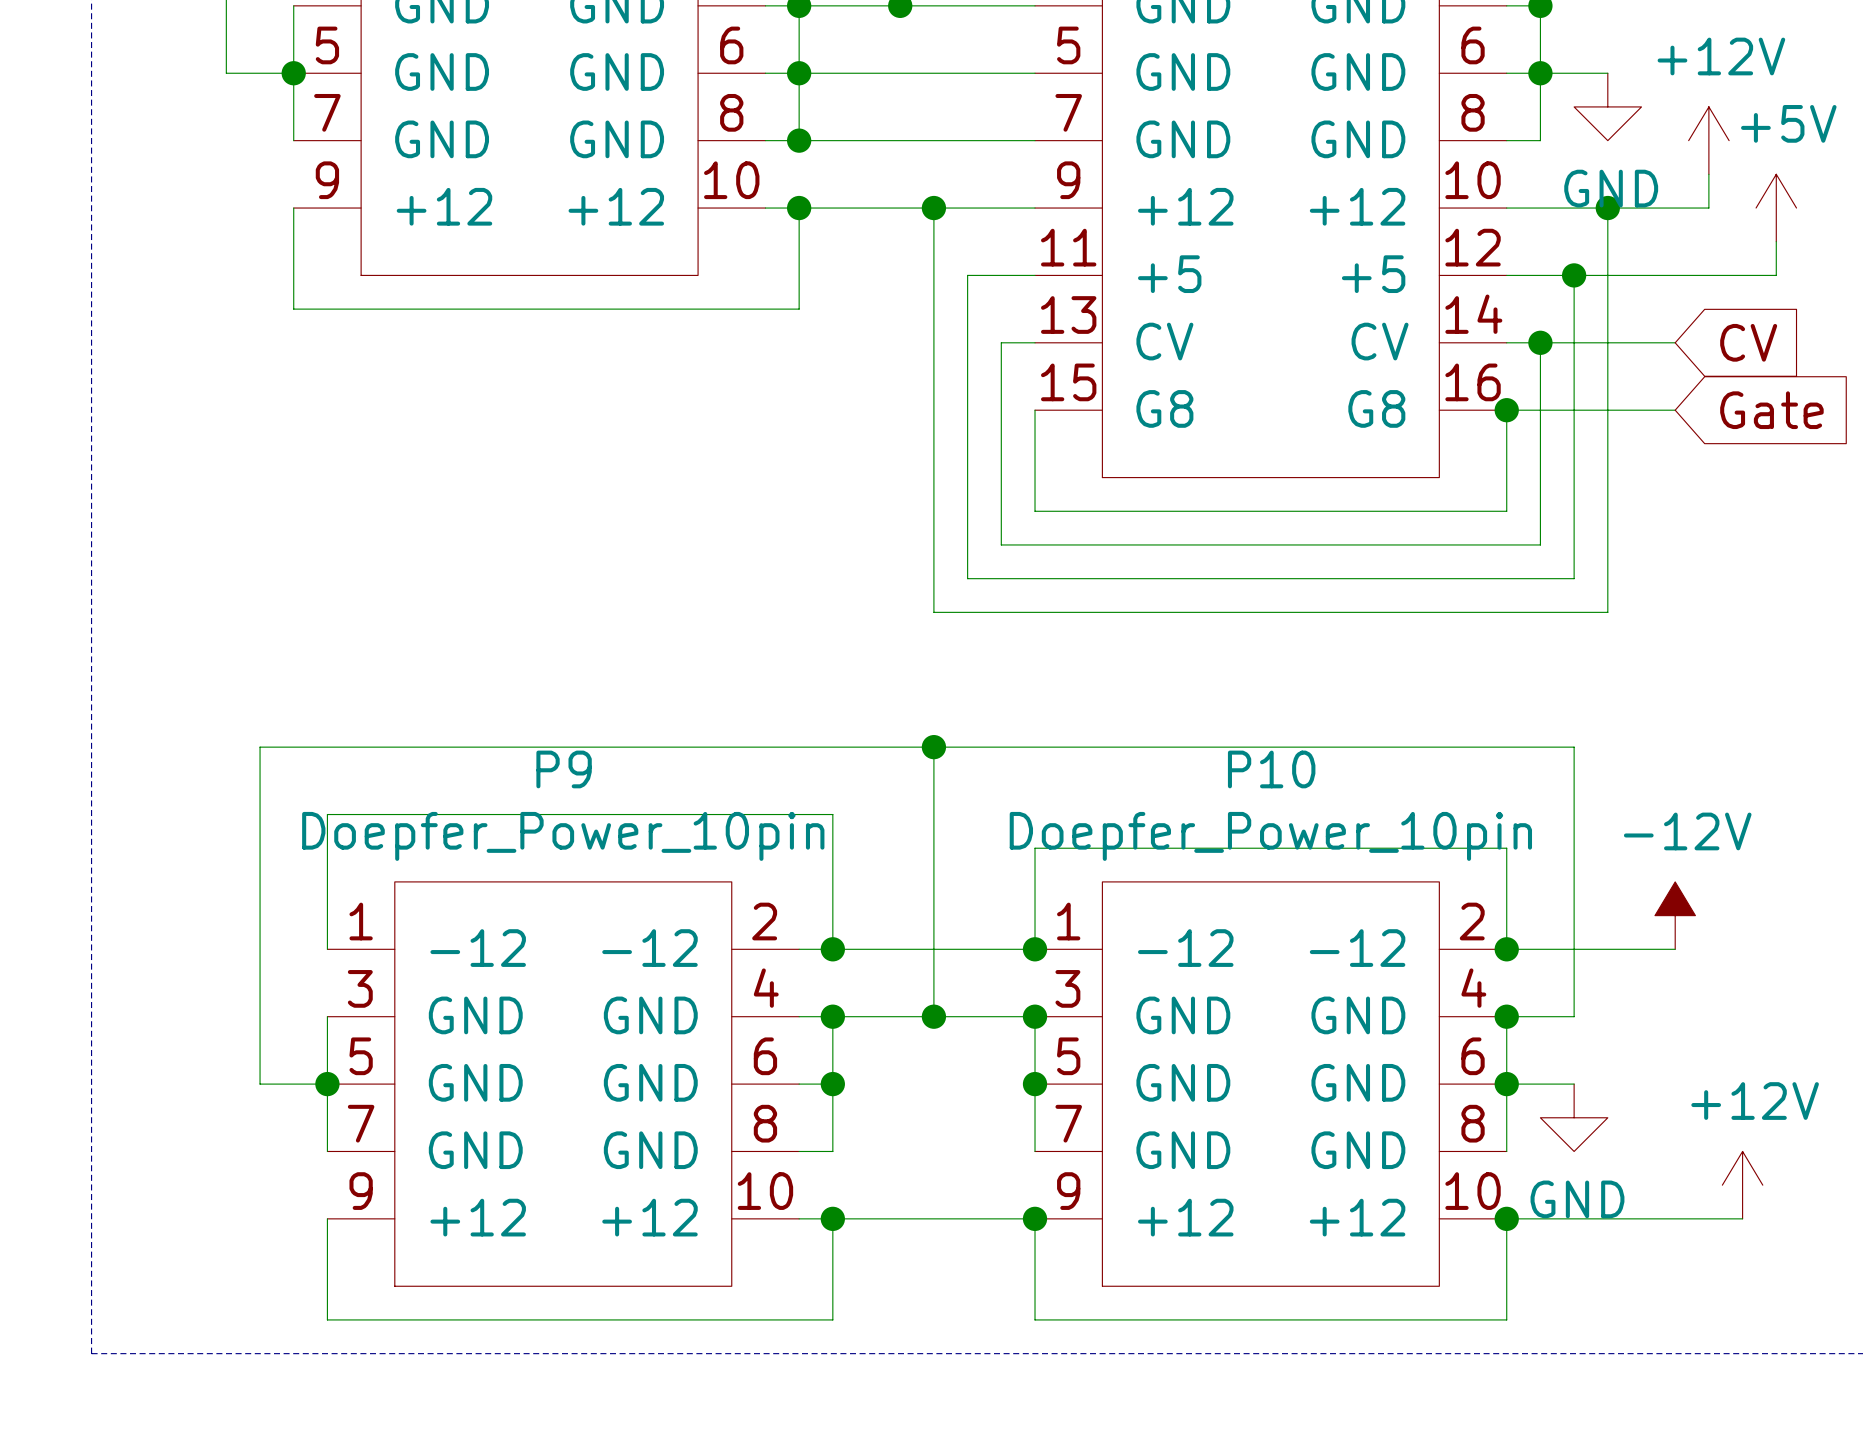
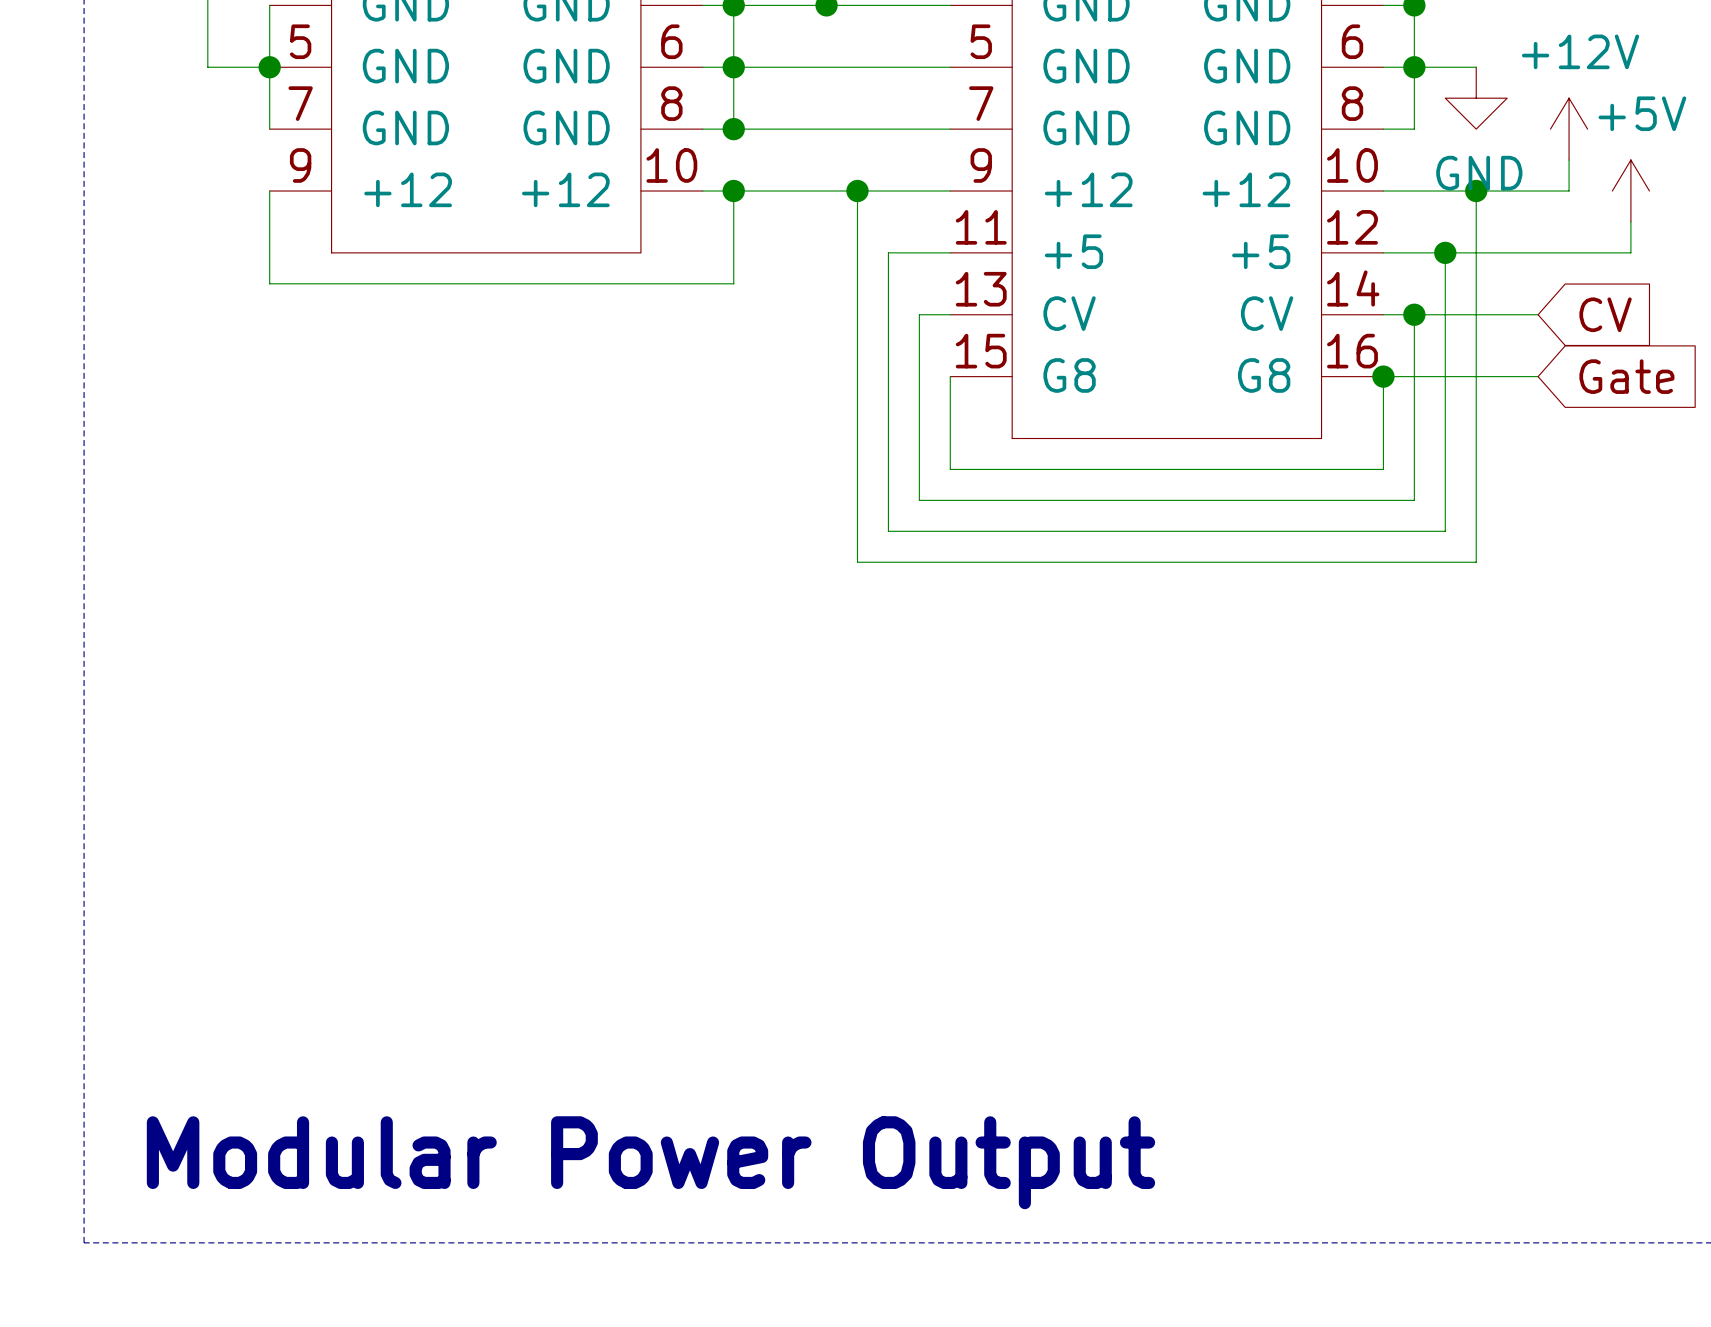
wire: (933, 747) (933, 1016) -> none
junction: (933, 747) -> none
power symbol: -12V (1675, 915) -> none
wire: (327, 949) (327, 814) (832, 814) (832, 949) -> none
wire: (799, 949) (1035, 949) (1035, 848) (1506, 848) (1506, 949) (1675, 949) -> none
junction: (832, 949) -> none
junction: (1035, 949) -> none
junction: (1506, 949) -> none
wire: (327, 1016) (327, 1151) -> none
wire: (799, 1016) (1035, 1016) (1035, 1151) -> none
wire: (832, 1016) (832, 1151) (799, 1151) -> none
junction: (832, 1016) -> none
junction: (933, 1016) -> none
junction: (1035, 1016) -> none
junction: (1506, 1016) -> none
wire: (327, 1084) (260, 1084) (260, 747) (1574, 747) (1574, 1016) (1506, 1016) (1506, 1151) -> none
junction: (327, 1084) -> none
P9: Doepfer_Power_10pin (563, 1084) -> none
wire: (799, 1084) (832, 1084) -> none
junction: (832, 1084) -> none
junction: (1035, 1084) -> none
P10: Doepfer_Power_10pin (1270, 1084) -> none
wire: (1506, 1084) (1574, 1084) -> none
junction: (1506, 1084) -> none
power symbol: GND (1574, 1117) -> none
power symbol: +12V (1742, 1185) -> none
wire: (327, 1218) (327, 1319) (832, 1319) (832, 1218) -> none
wire: (799, 1218) (1035, 1218) (1035, 1319) (1506, 1319) (1506, 1218) (1742, 1218) -> none
junction: (832, 1218) -> none
junction: (1035, 1218) -> none
junction: (1506, 1218) -> none
text: none -> Modular Power Output (650, 1162)

